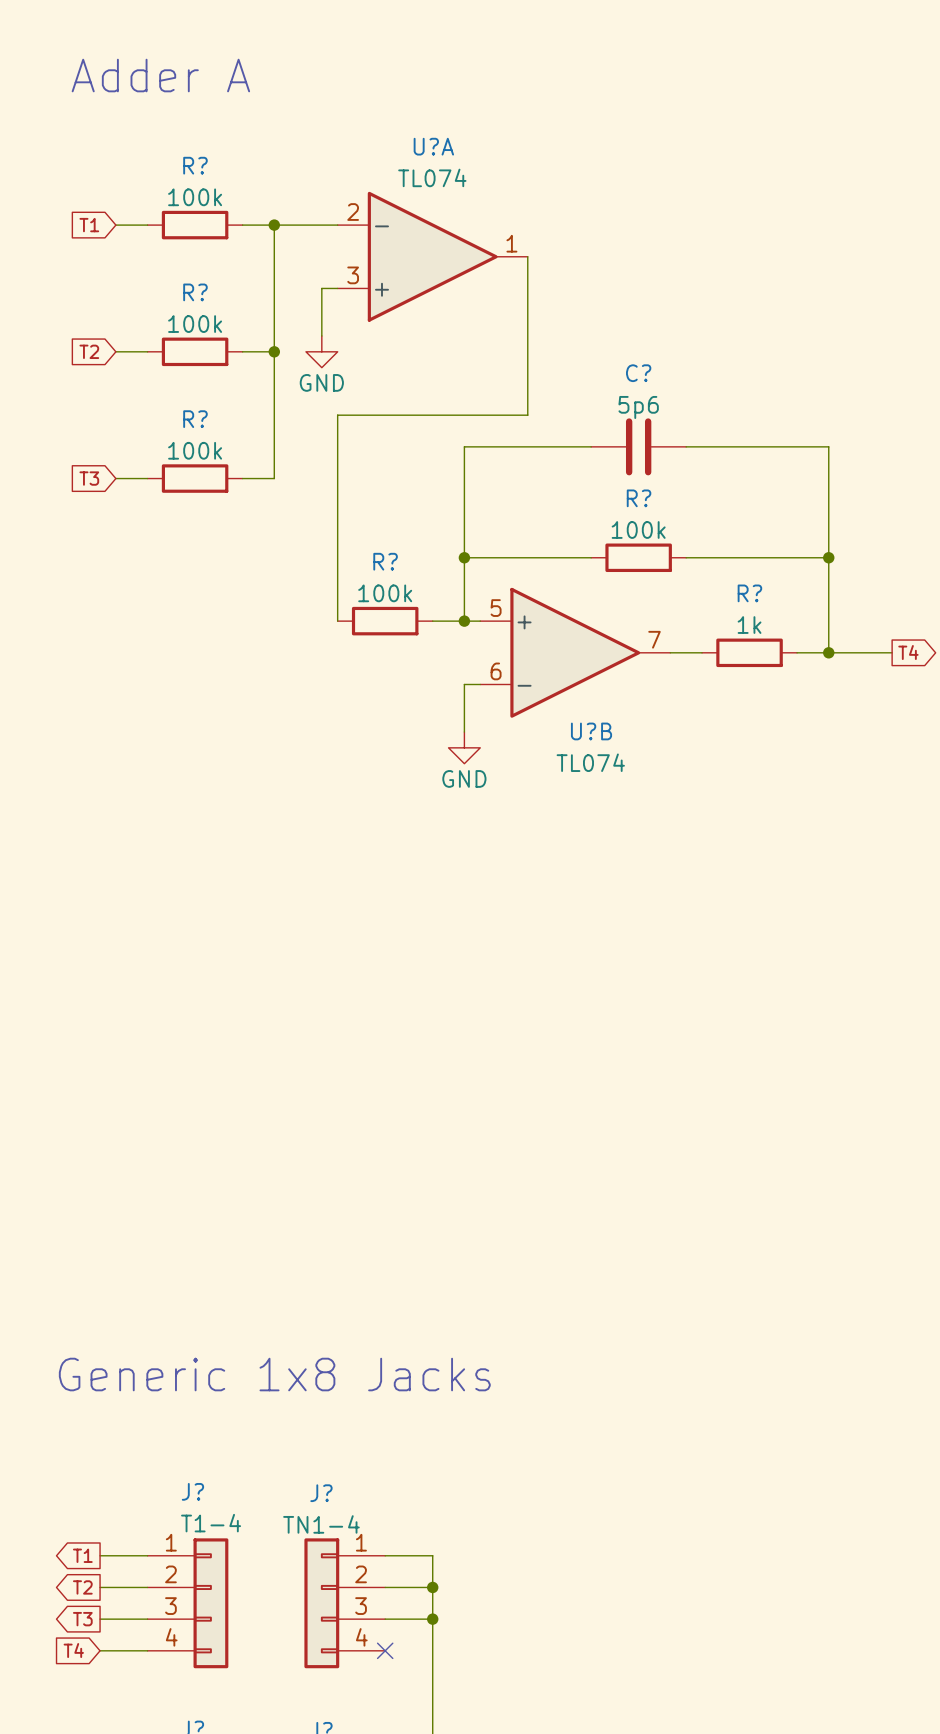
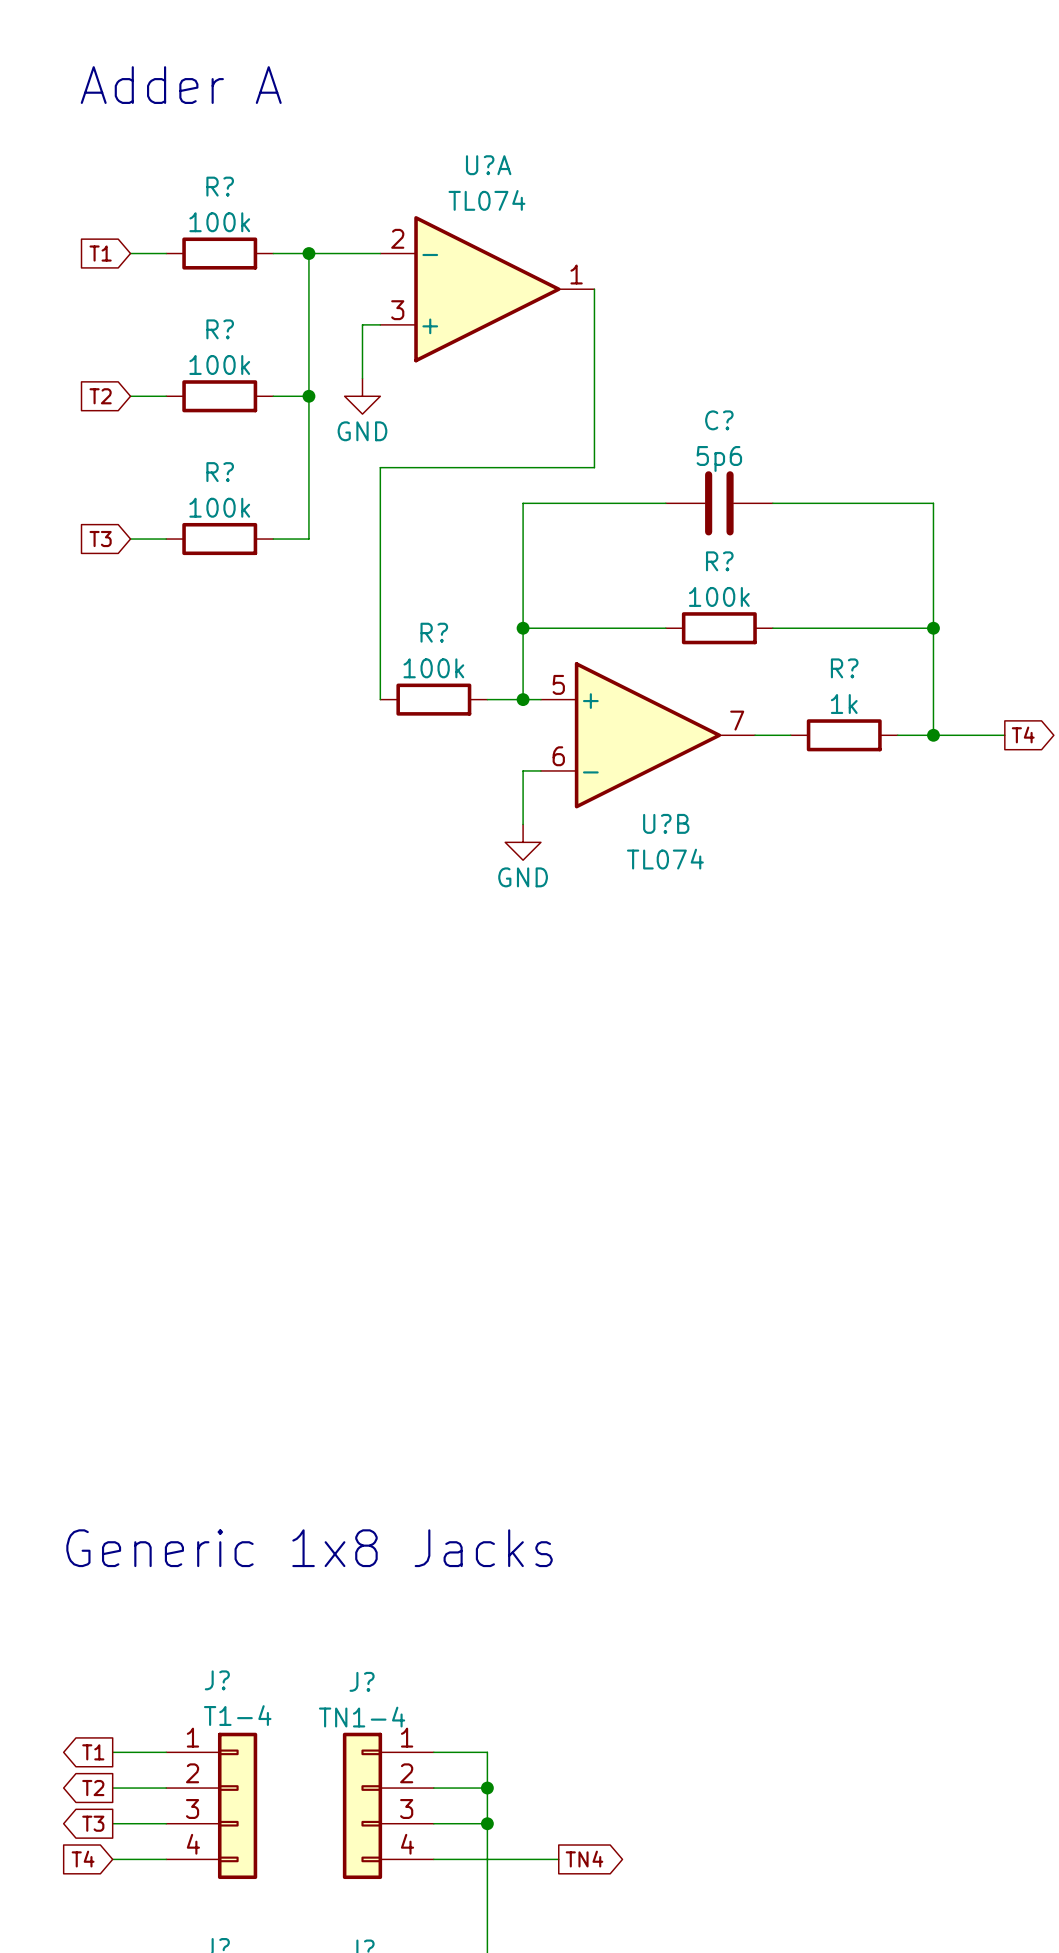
wire: none -> (433, 1859) (558, 1859)
no-connect mark: (385, 1650) -> none
global label: none -> TN4 (584, 1859)

